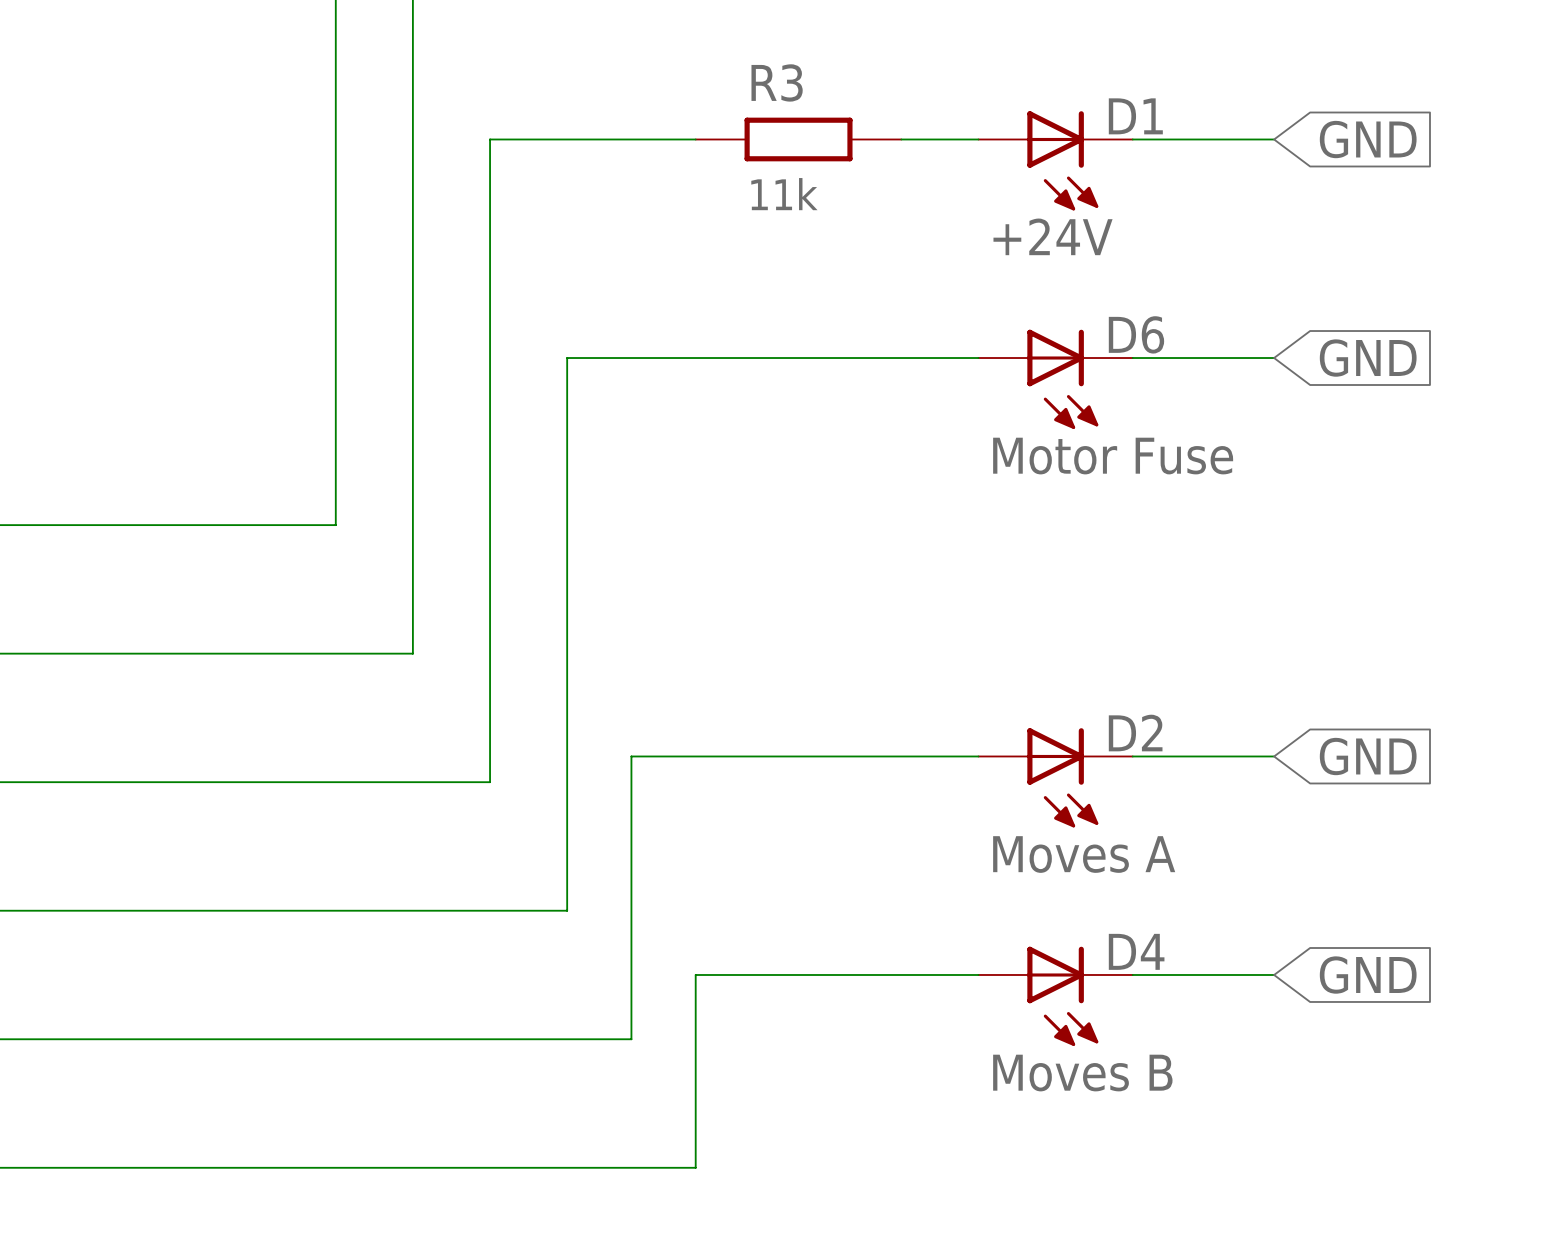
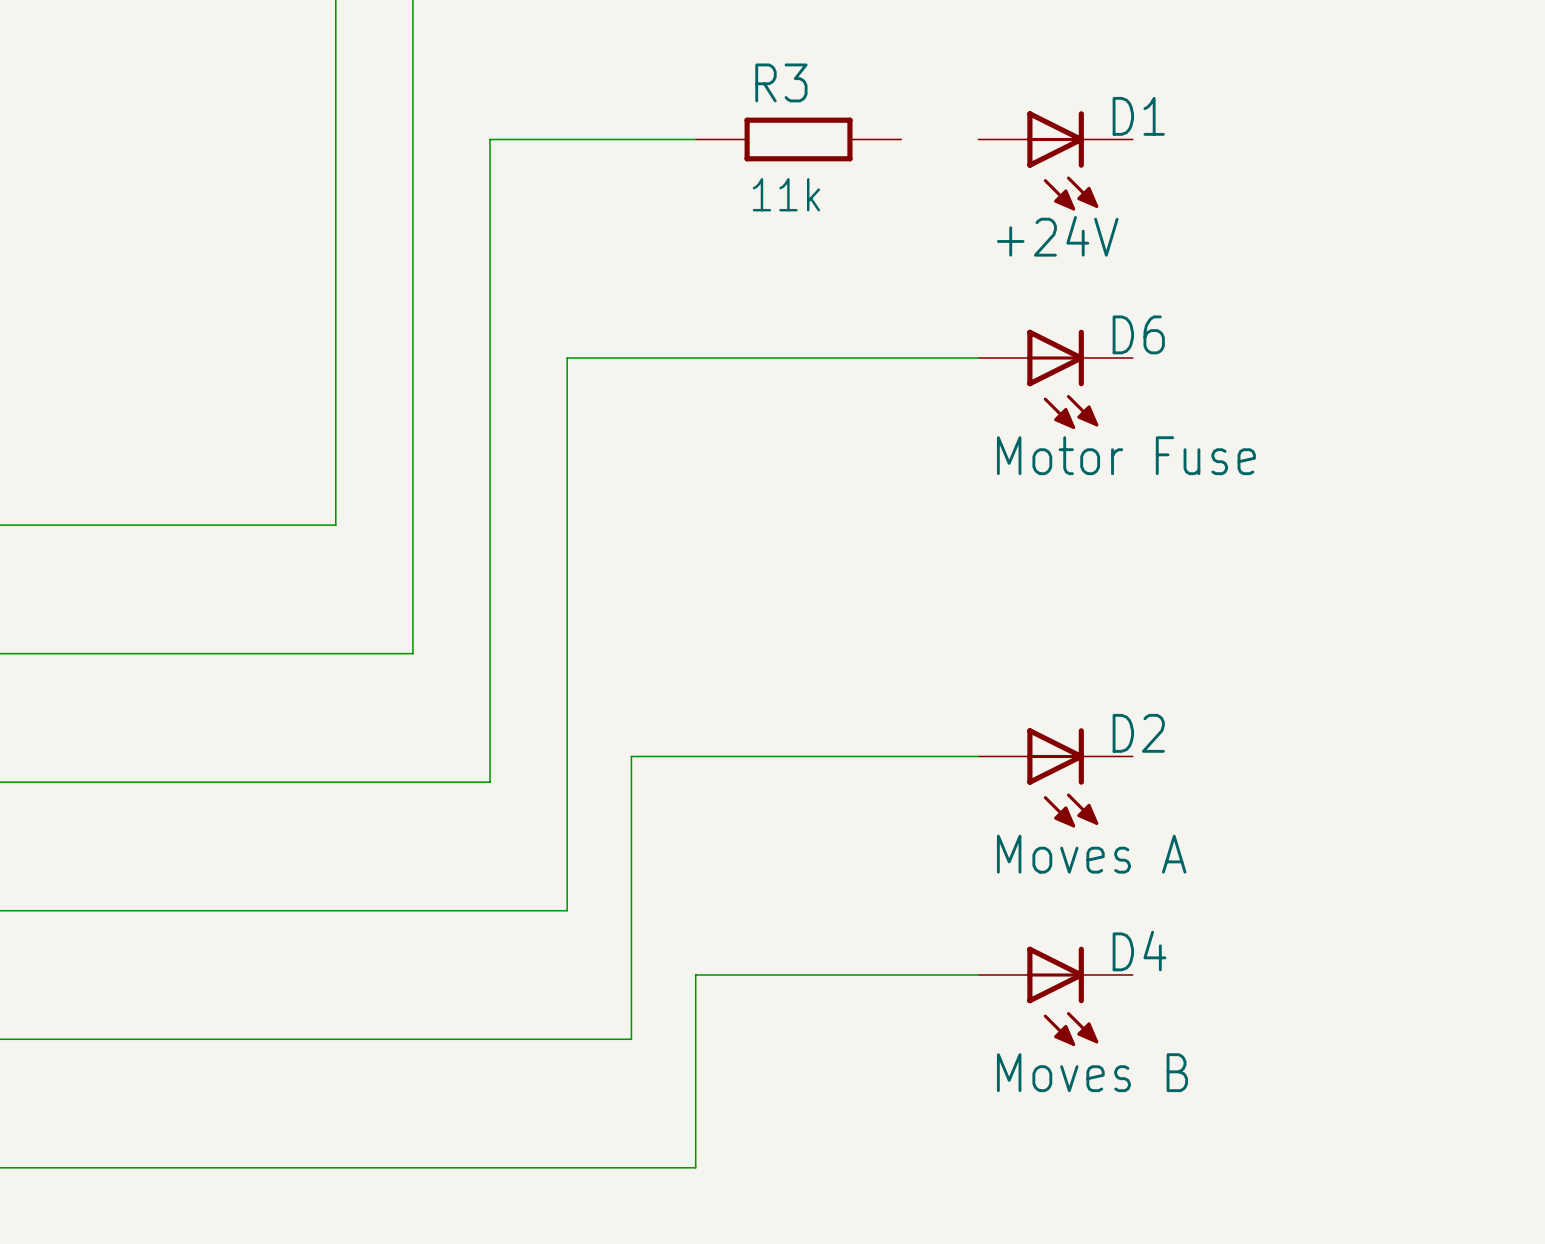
wire: (901, 139) (978, 139) -> none
wire: (1132, 139) (1274, 139) -> none
global label: GND (1368, 139) -> none
wire: (1132, 358) (1274, 358) -> none
global label: GND (1368, 358) -> none
wire: (1132, 756) (1274, 756) -> none
global label: GND (1368, 756) -> none
wire: (1132, 974) (1274, 974) -> none
global label: GND (1368, 975) -> none

